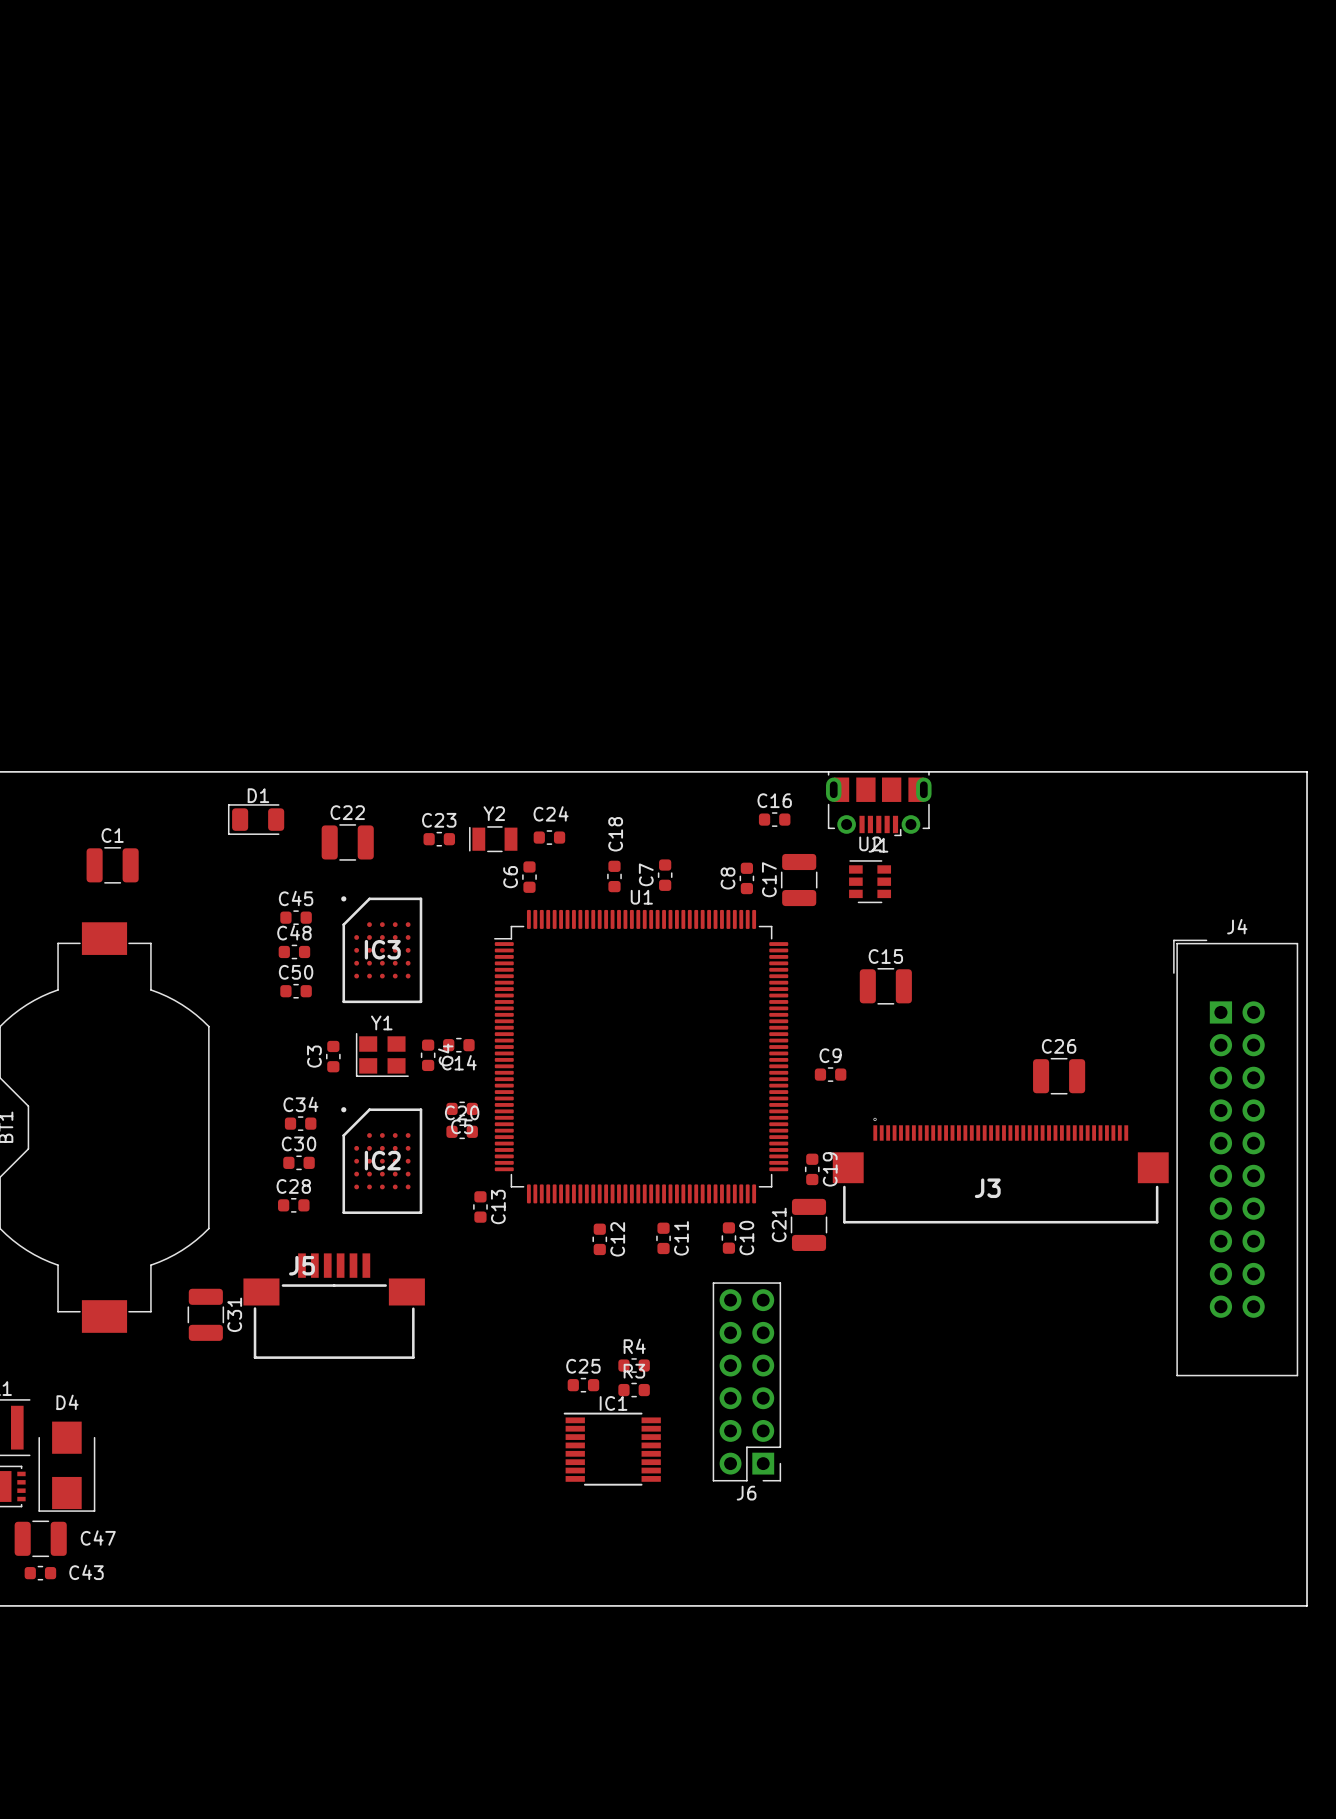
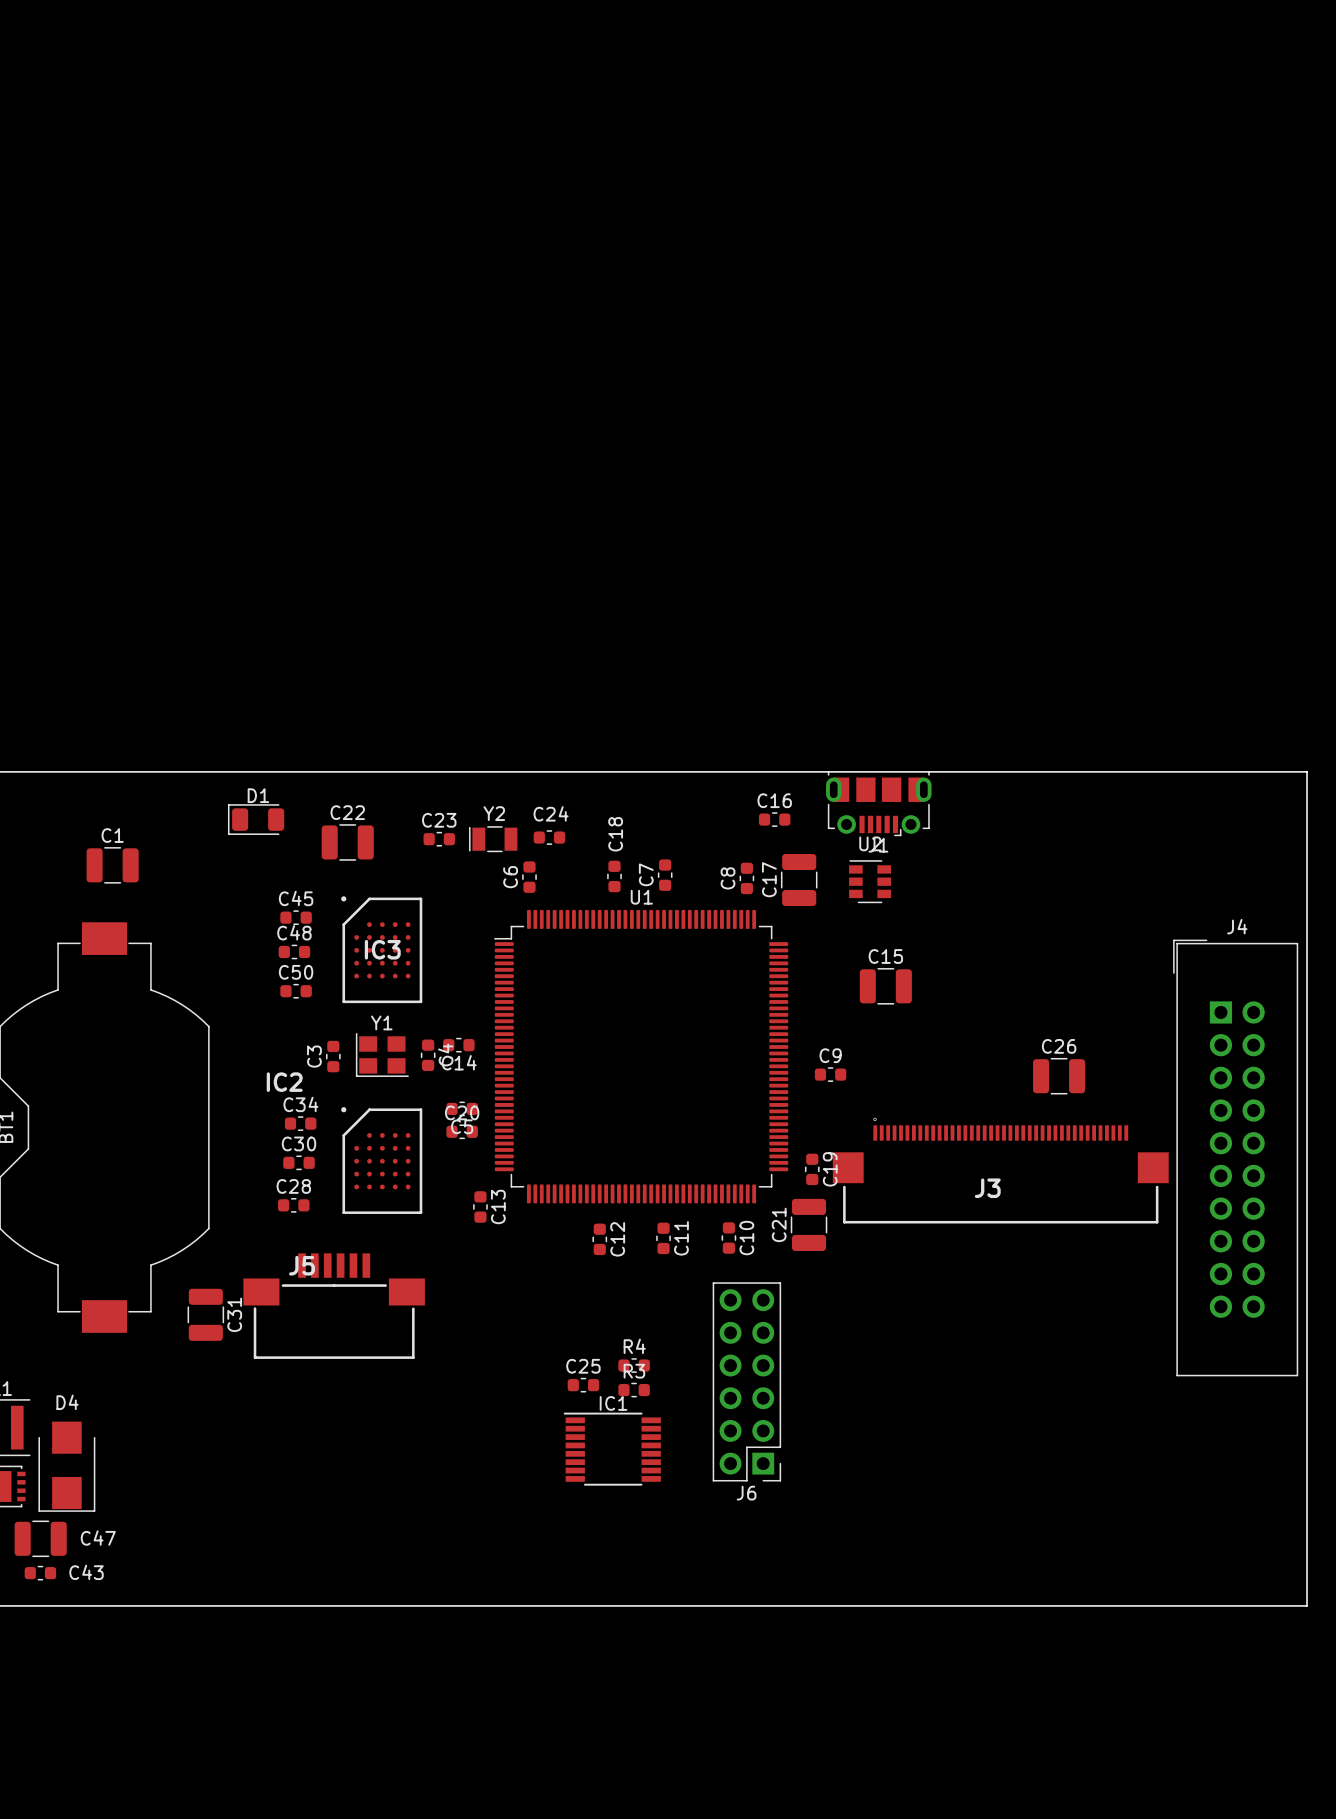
IC2 name position: IC2 (382, 1160) -> IC2 (284, 1082)

